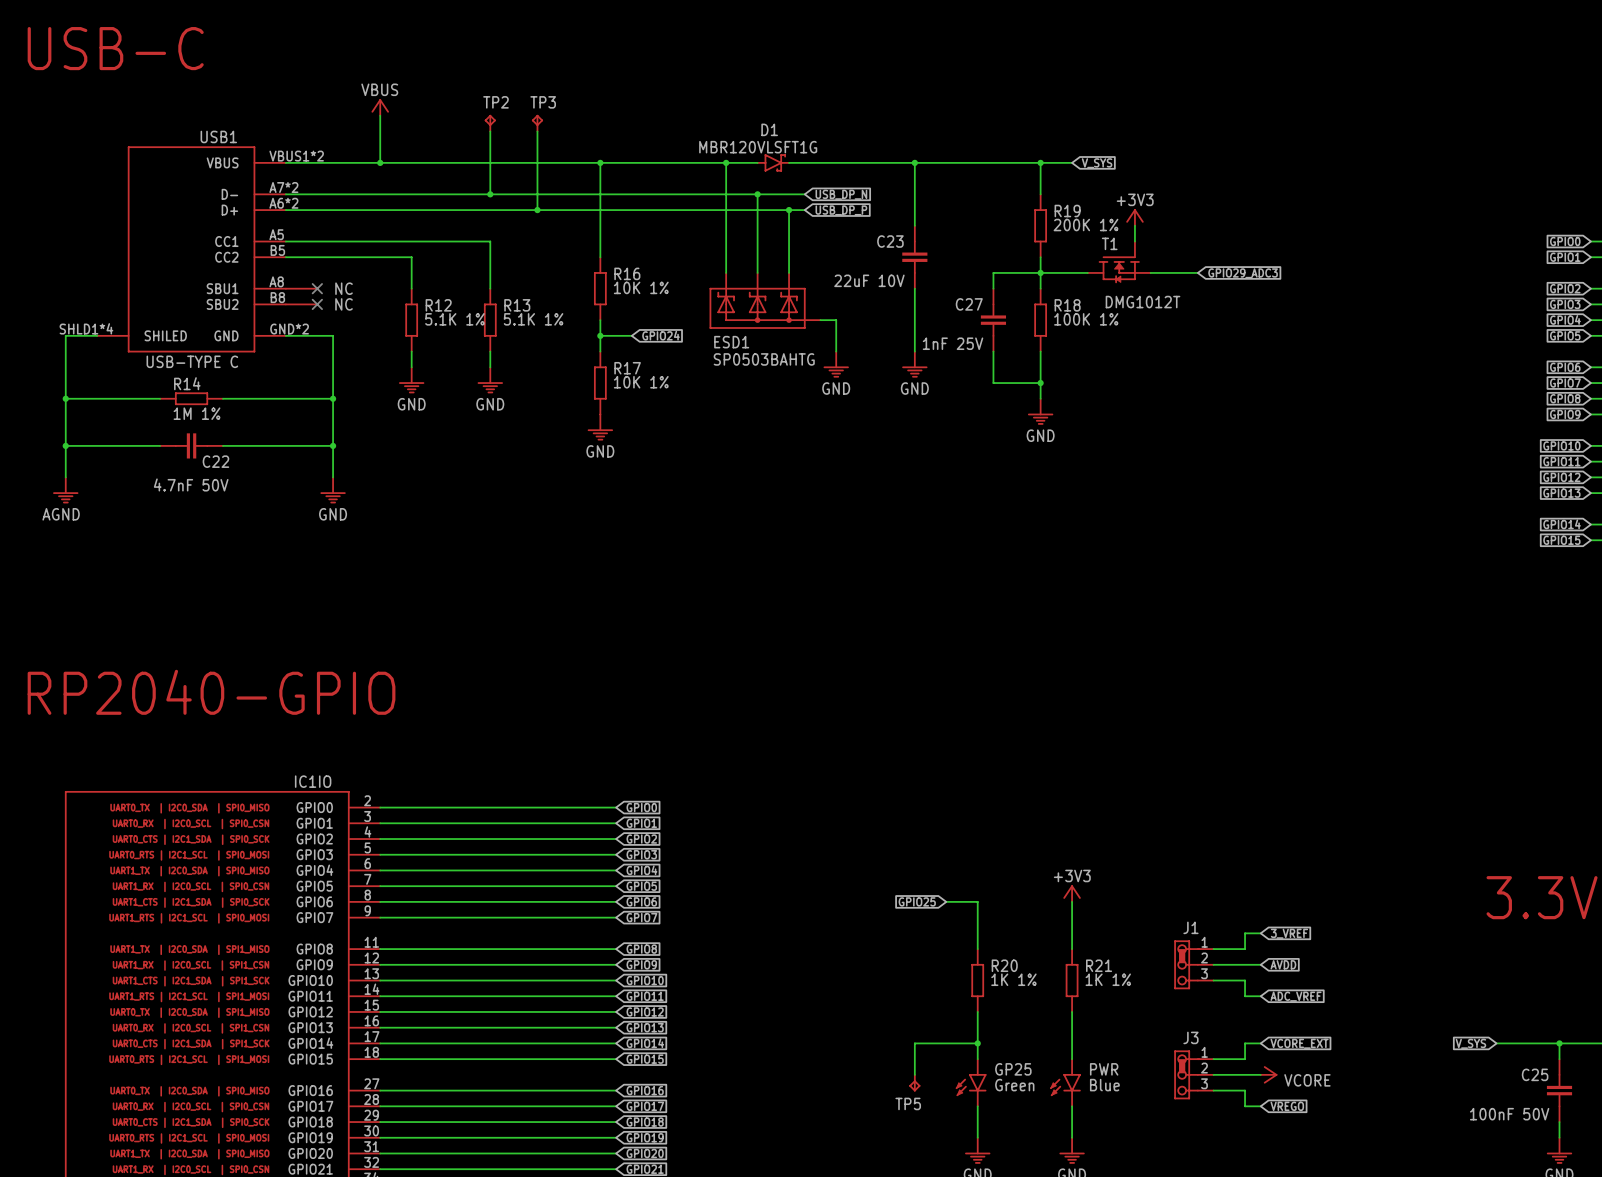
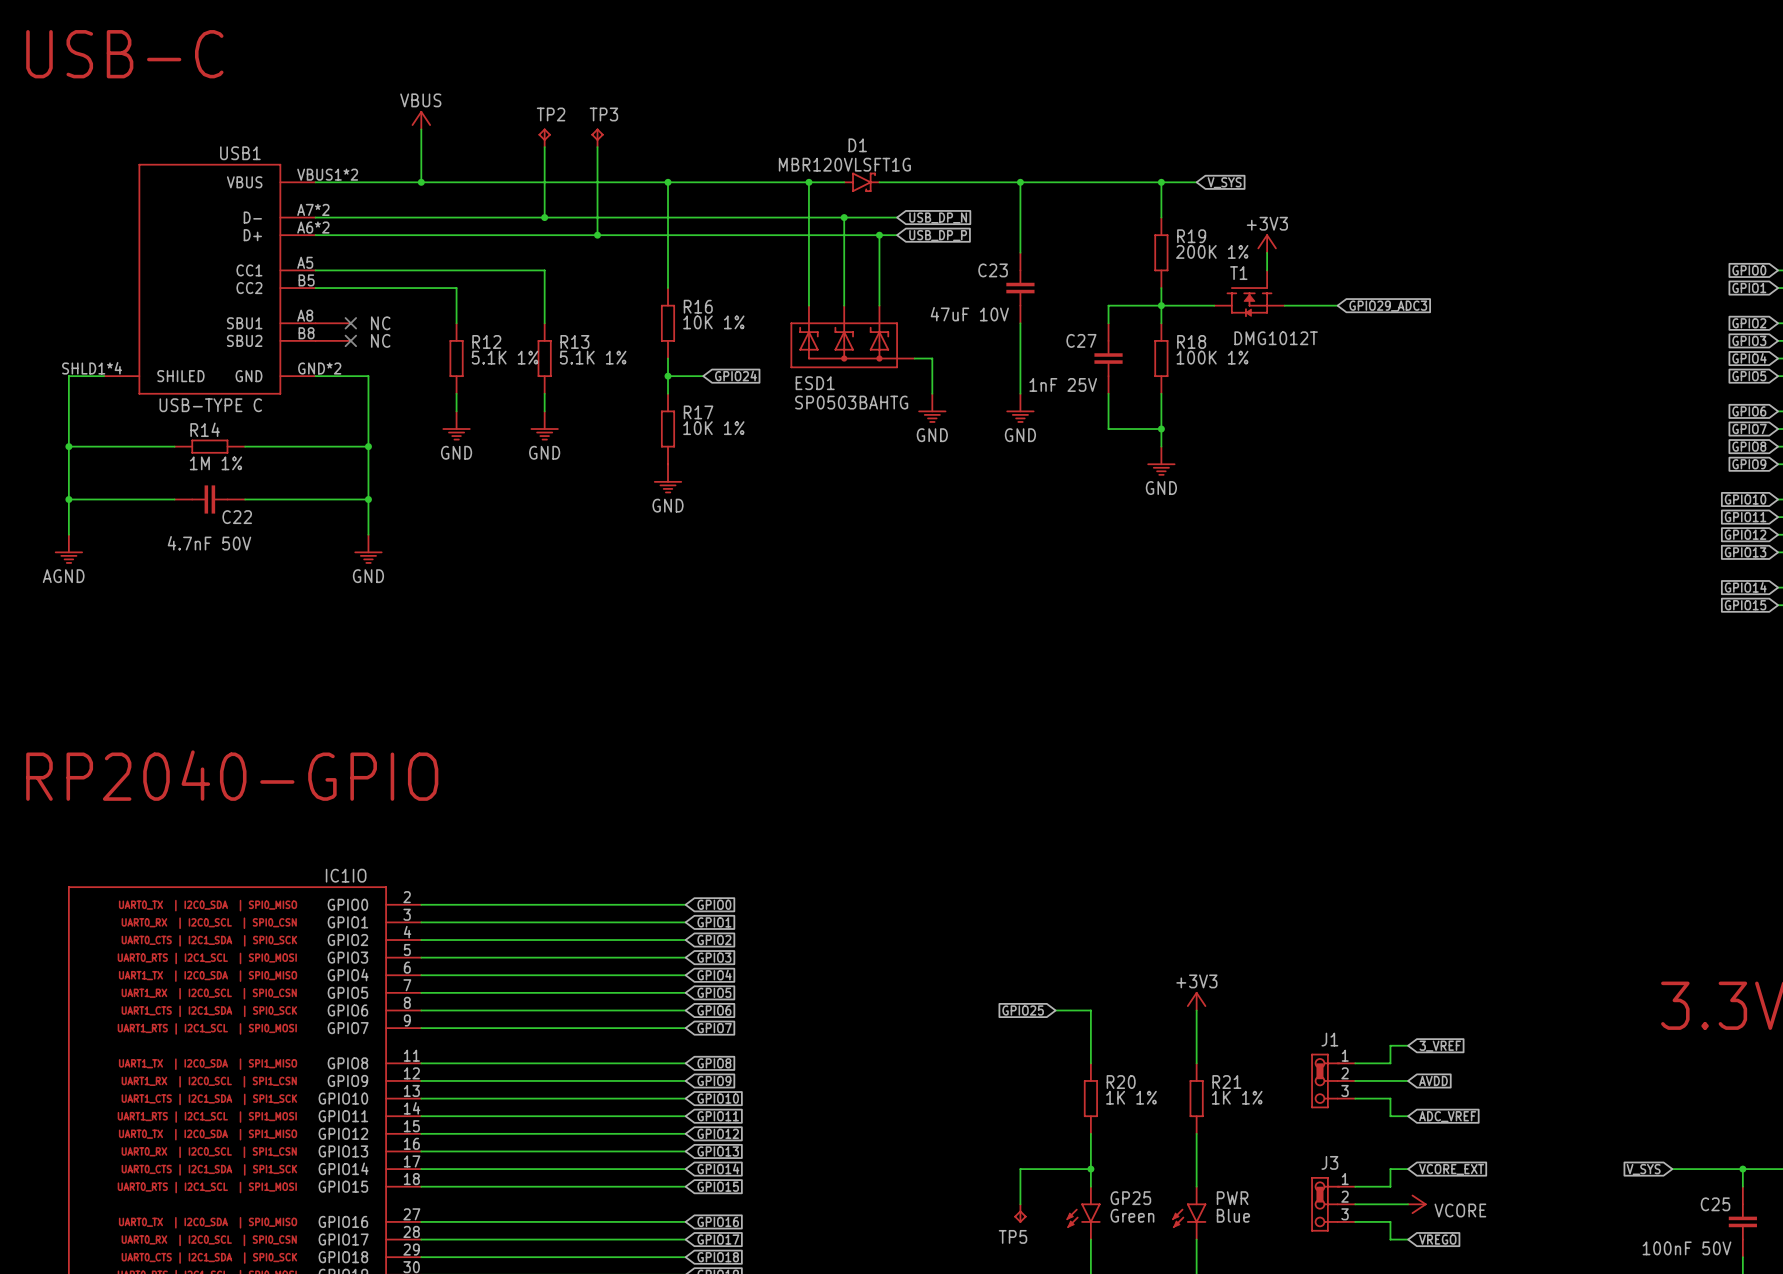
C23 value: 22uF 10V (869, 280) -> 47uF 10V (969, 314)

